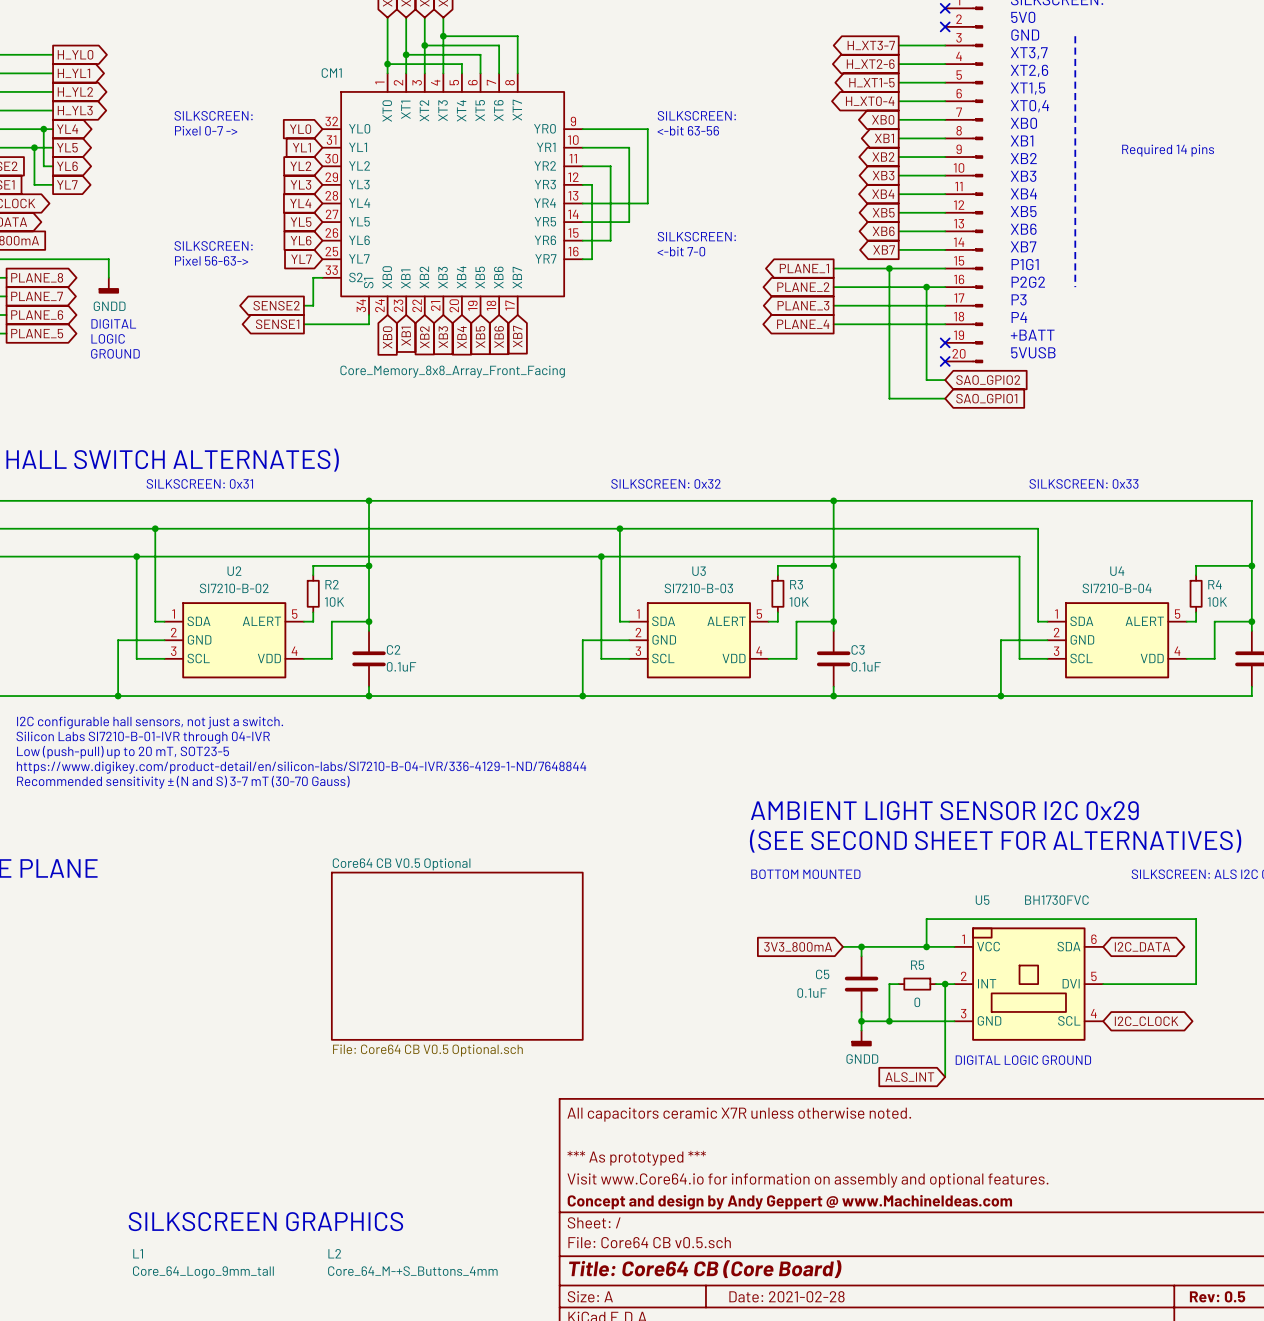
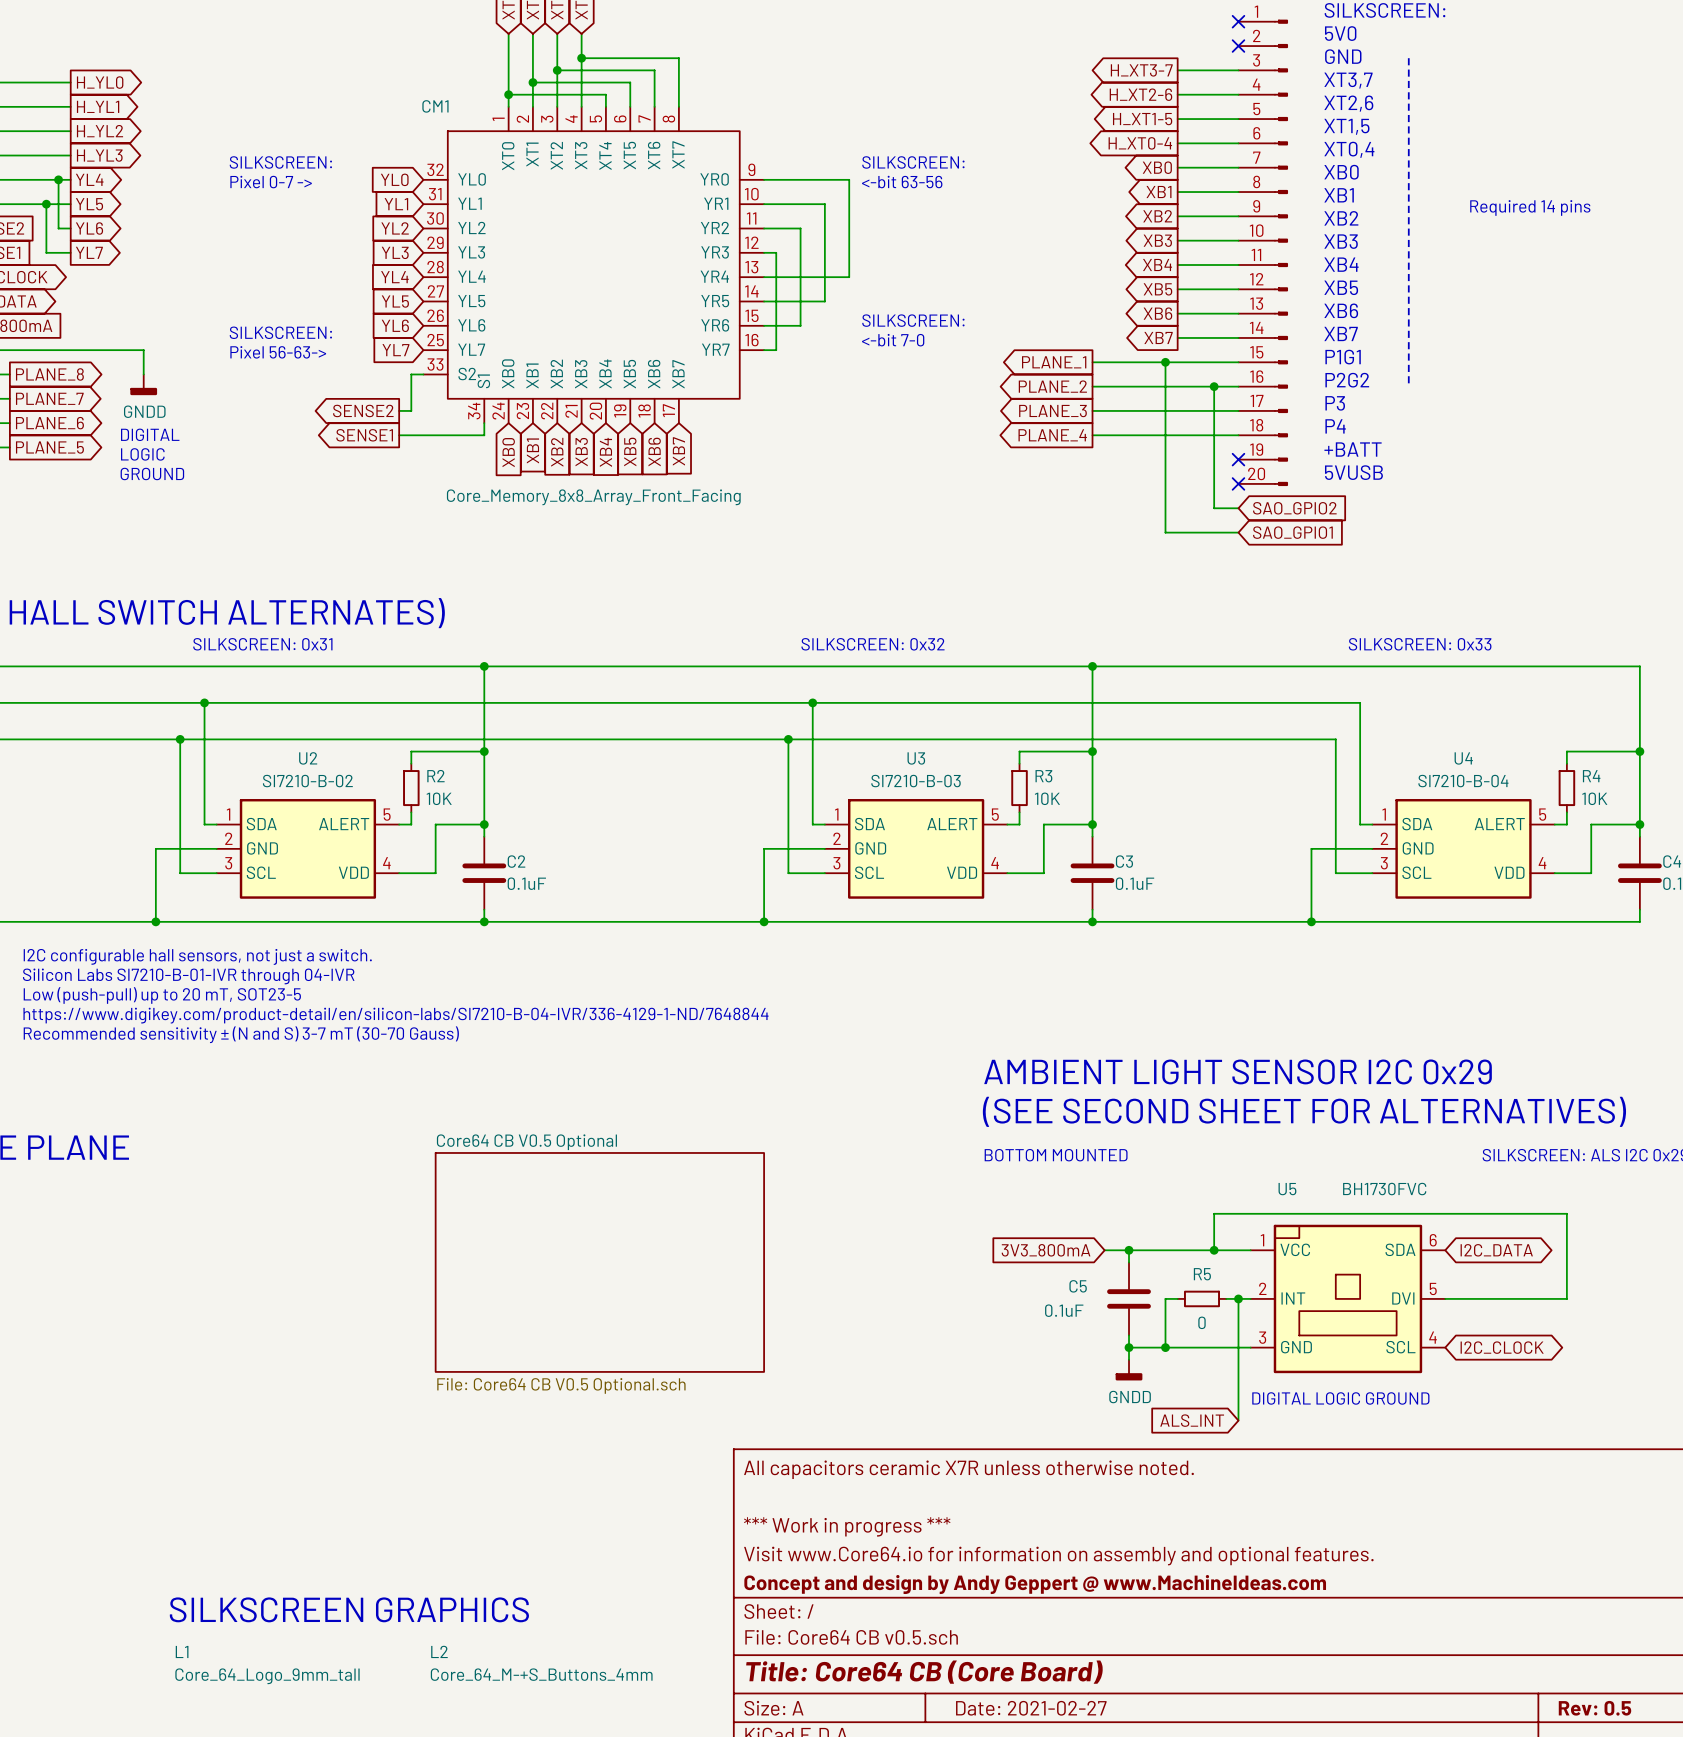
title block: *** As prototyped *** (636, 1158) -> *** Work in progress *** (847, 1526)
title block: Date: 2021-02-28 (786, 1296) -> Date: 2021-02-27 (1031, 1708)

